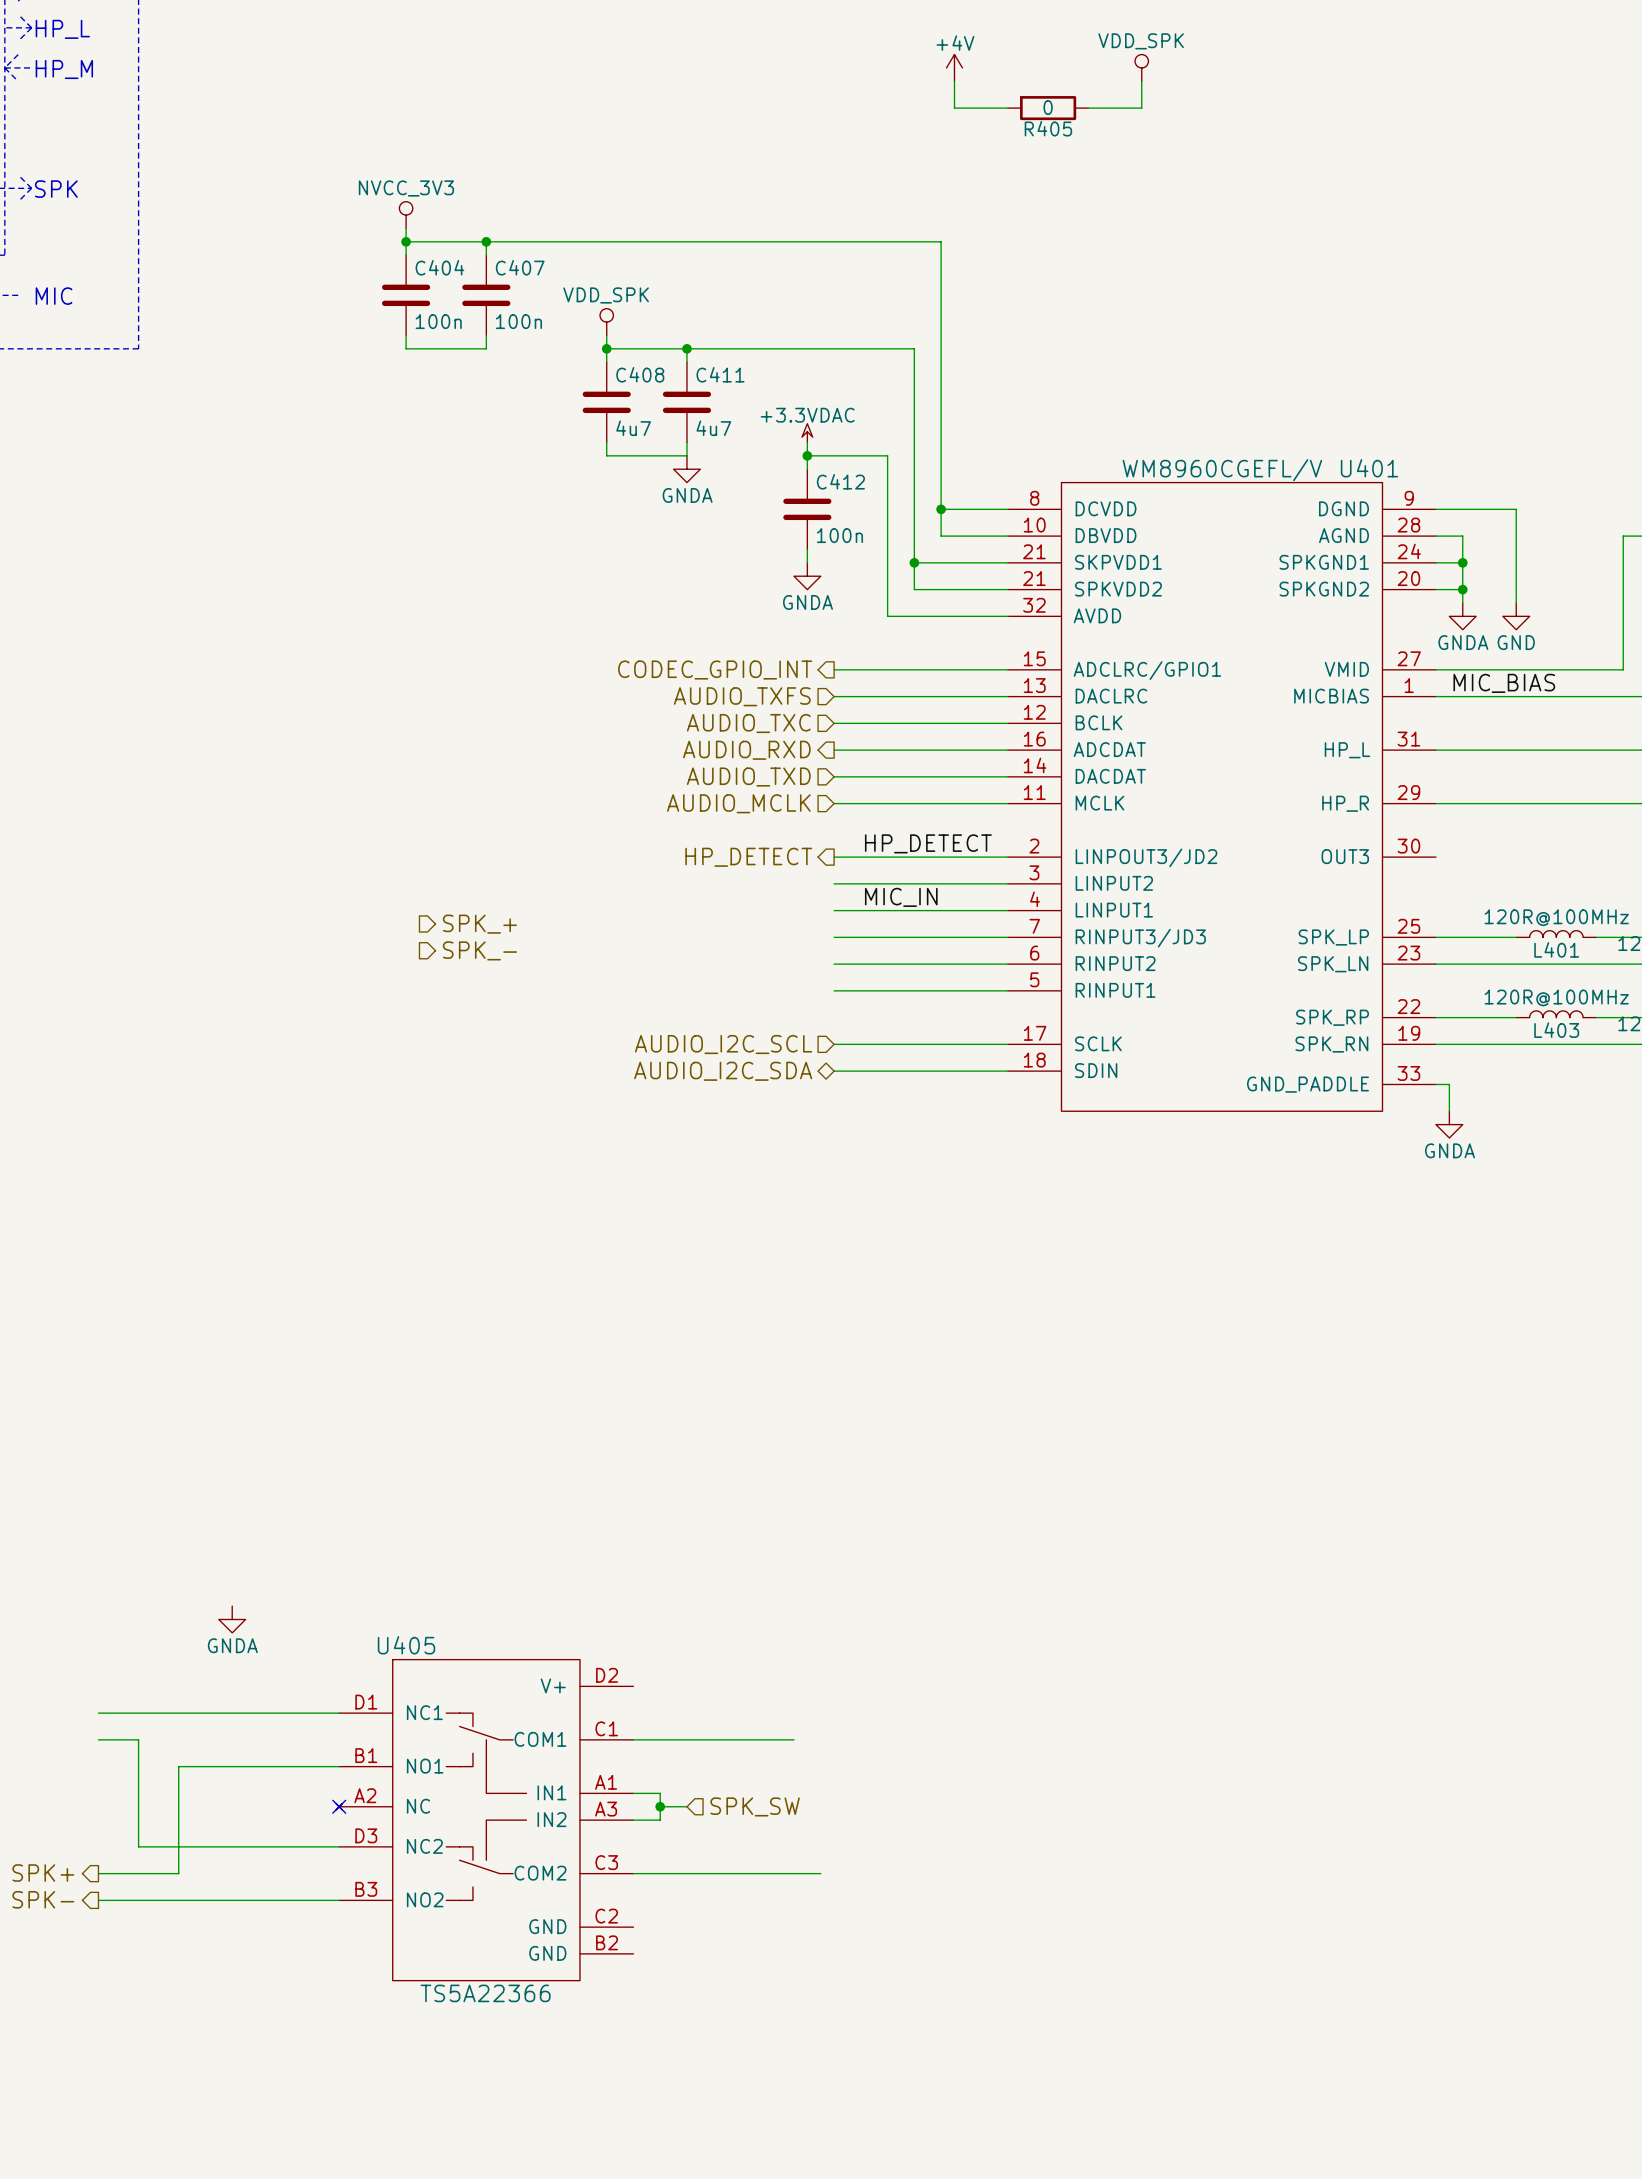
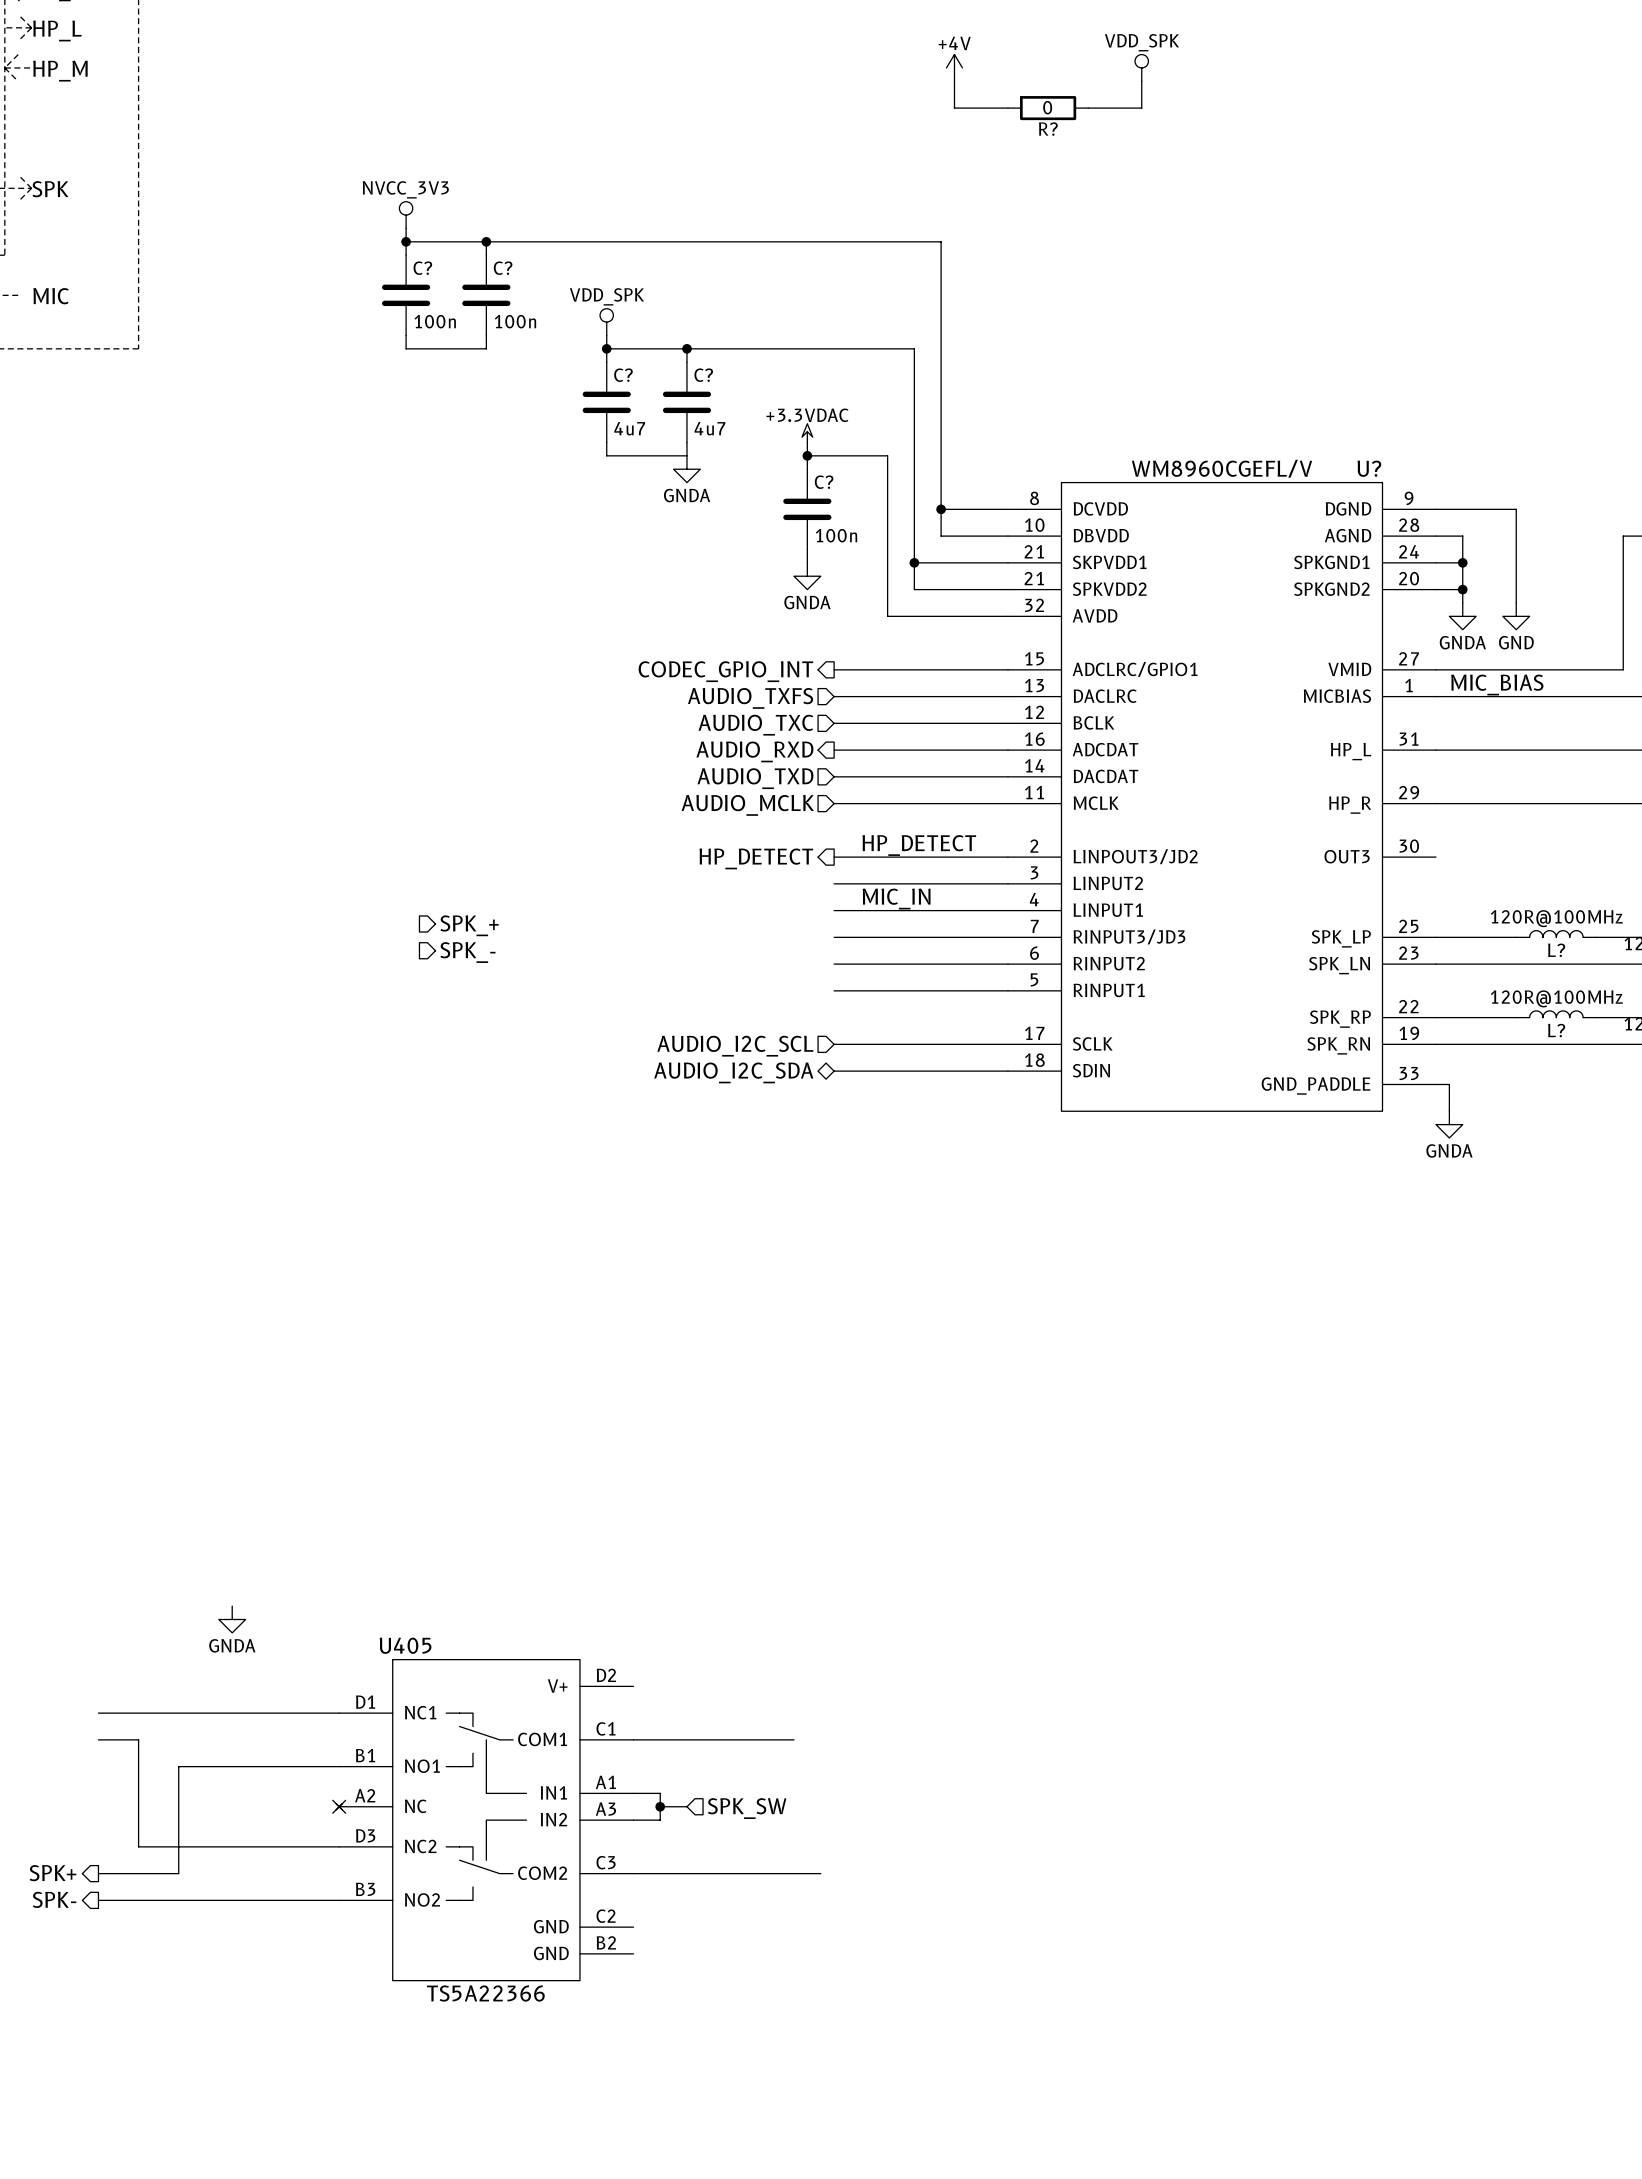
R405 name: R405 (1048, 128) -> R? (1048, 129)
C404 name: C404 (439, 267) -> C? (422, 268)
C407 name: C407 (520, 267) -> C? (503, 268)
C408 name: C408 (640, 374) -> C? (623, 375)
C411 name: C411 (720, 374) -> C? (703, 375)
U401 name: U401 (1369, 468) -> U? (1369, 468)
C412 name: C412 (840, 481) -> C? (824, 482)
L401 name: L401 (1556, 949) -> L? (1556, 950)
L403 name: L403 (1556, 1030) -> L? (1556, 1030)

